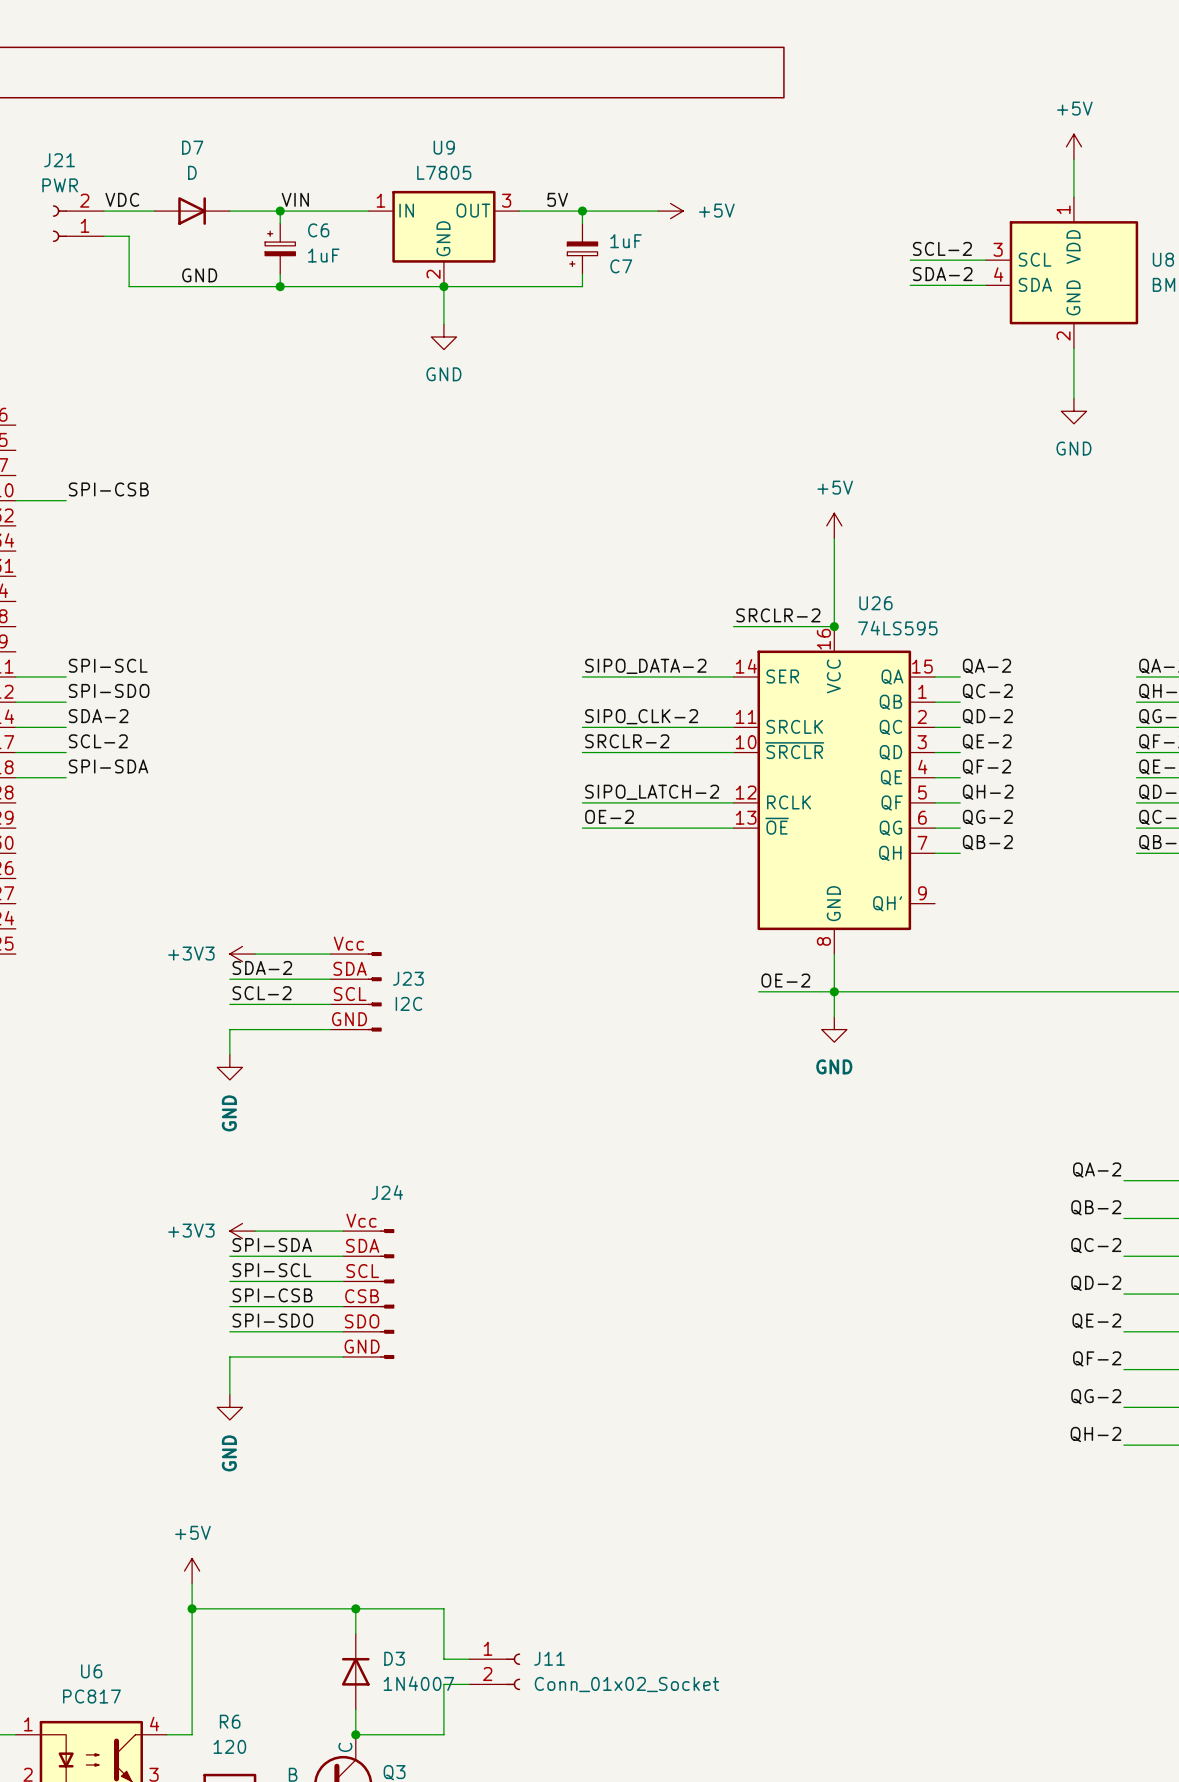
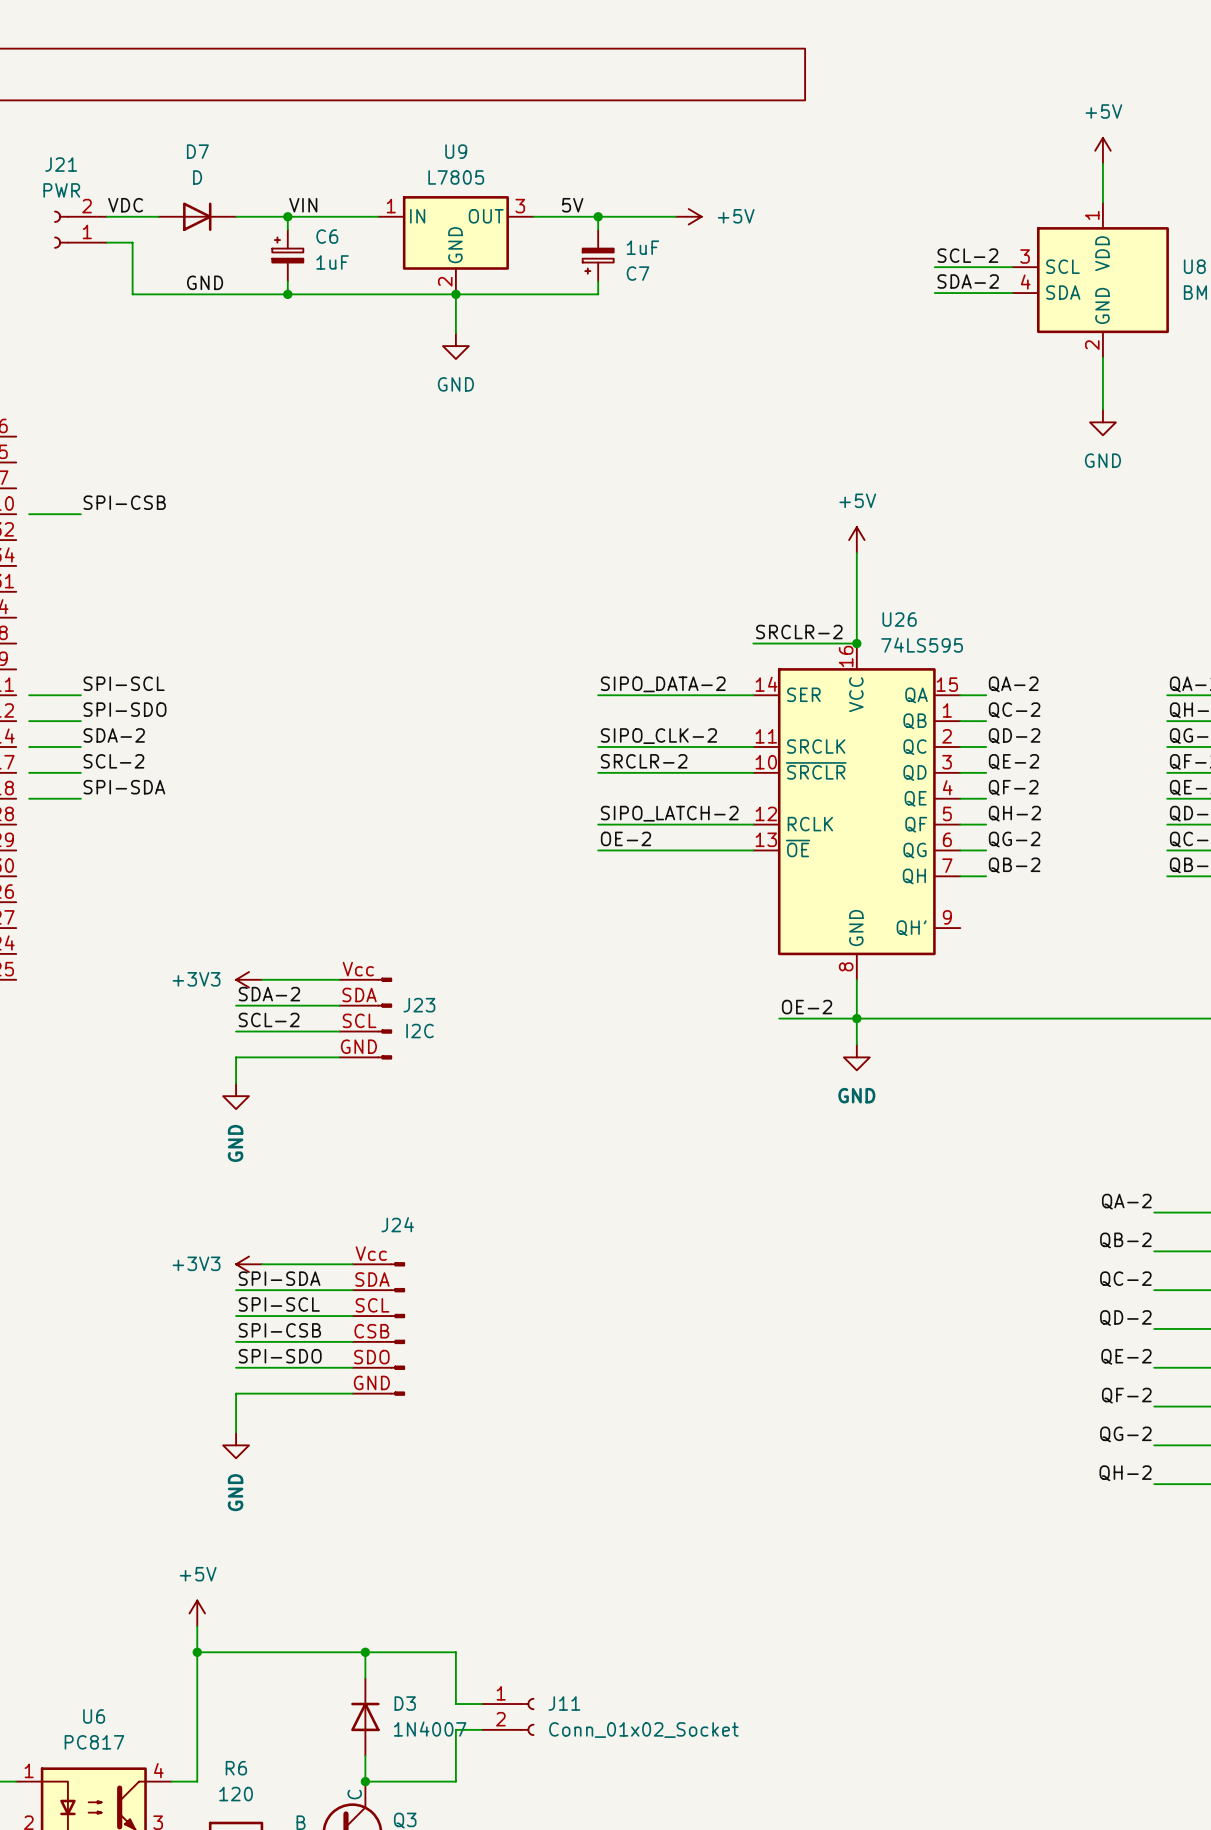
label position: SPI-CSB (108, 489) -> SPI-CSB (124, 502)
wire: (15, 500) (28, 500) -> (67, 514) (80, 514)
label position: SPI-SCL (108, 665) -> SPI-SCL (124, 683)
wire: (15, 676) (28, 676) -> (67, 695) (80, 695)
label position: SPI-SDO (109, 690) -> SPI-SDO (125, 709)
wire: (15, 702) (28, 702) -> (67, 721) (80, 721)
label position: SDA-2 (98, 716) -> SDA-2 (114, 735)
wire: (15, 727) (28, 727) -> (67, 747) (80, 747)
label position: SCL-2 (98, 741) -> SCL-2 (113, 761)
wire: (15, 752) (28, 752) -> (67, 772) (80, 772)
label position: SPI-SDA (108, 766) -> SPI-SDA (124, 787)
wire: (15, 777) (28, 777) -> (67, 798) (80, 798)

